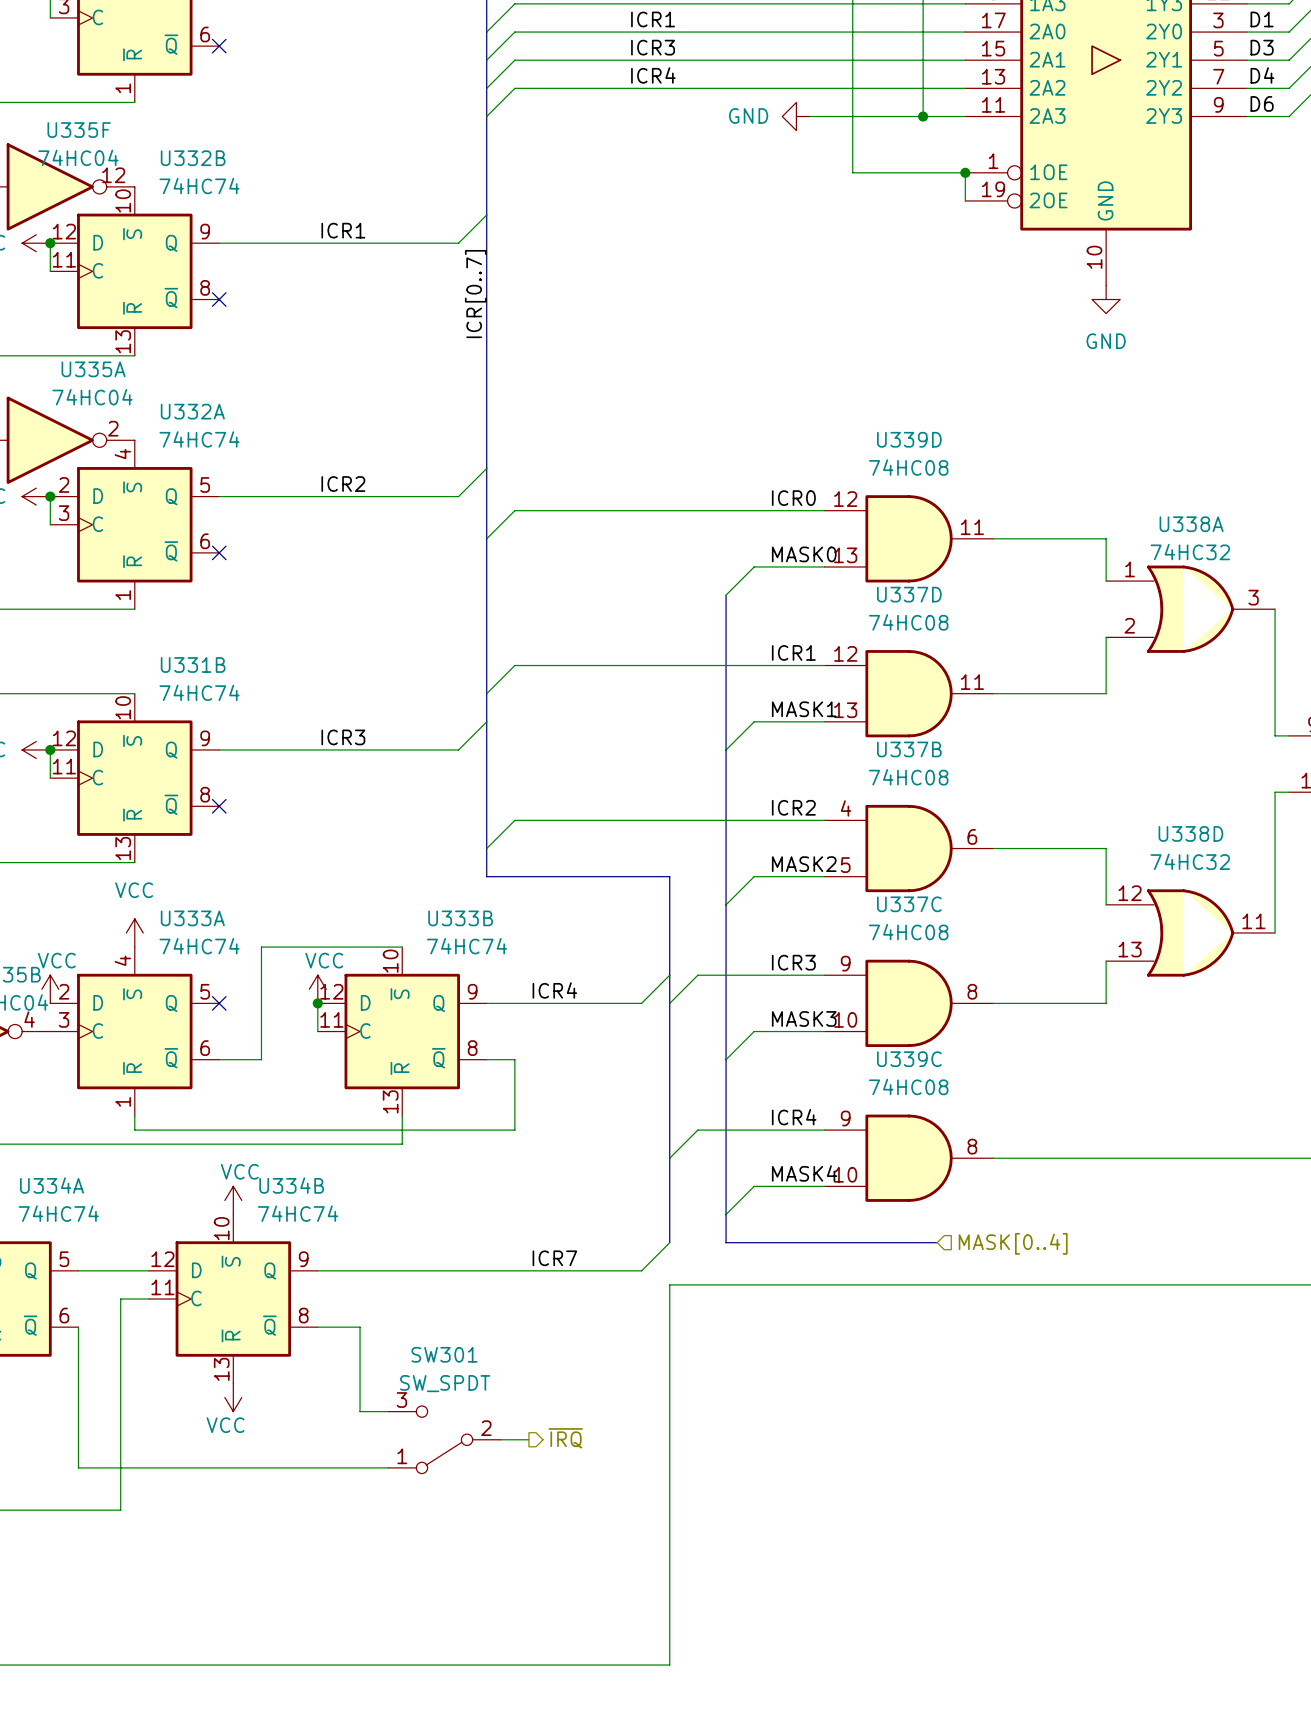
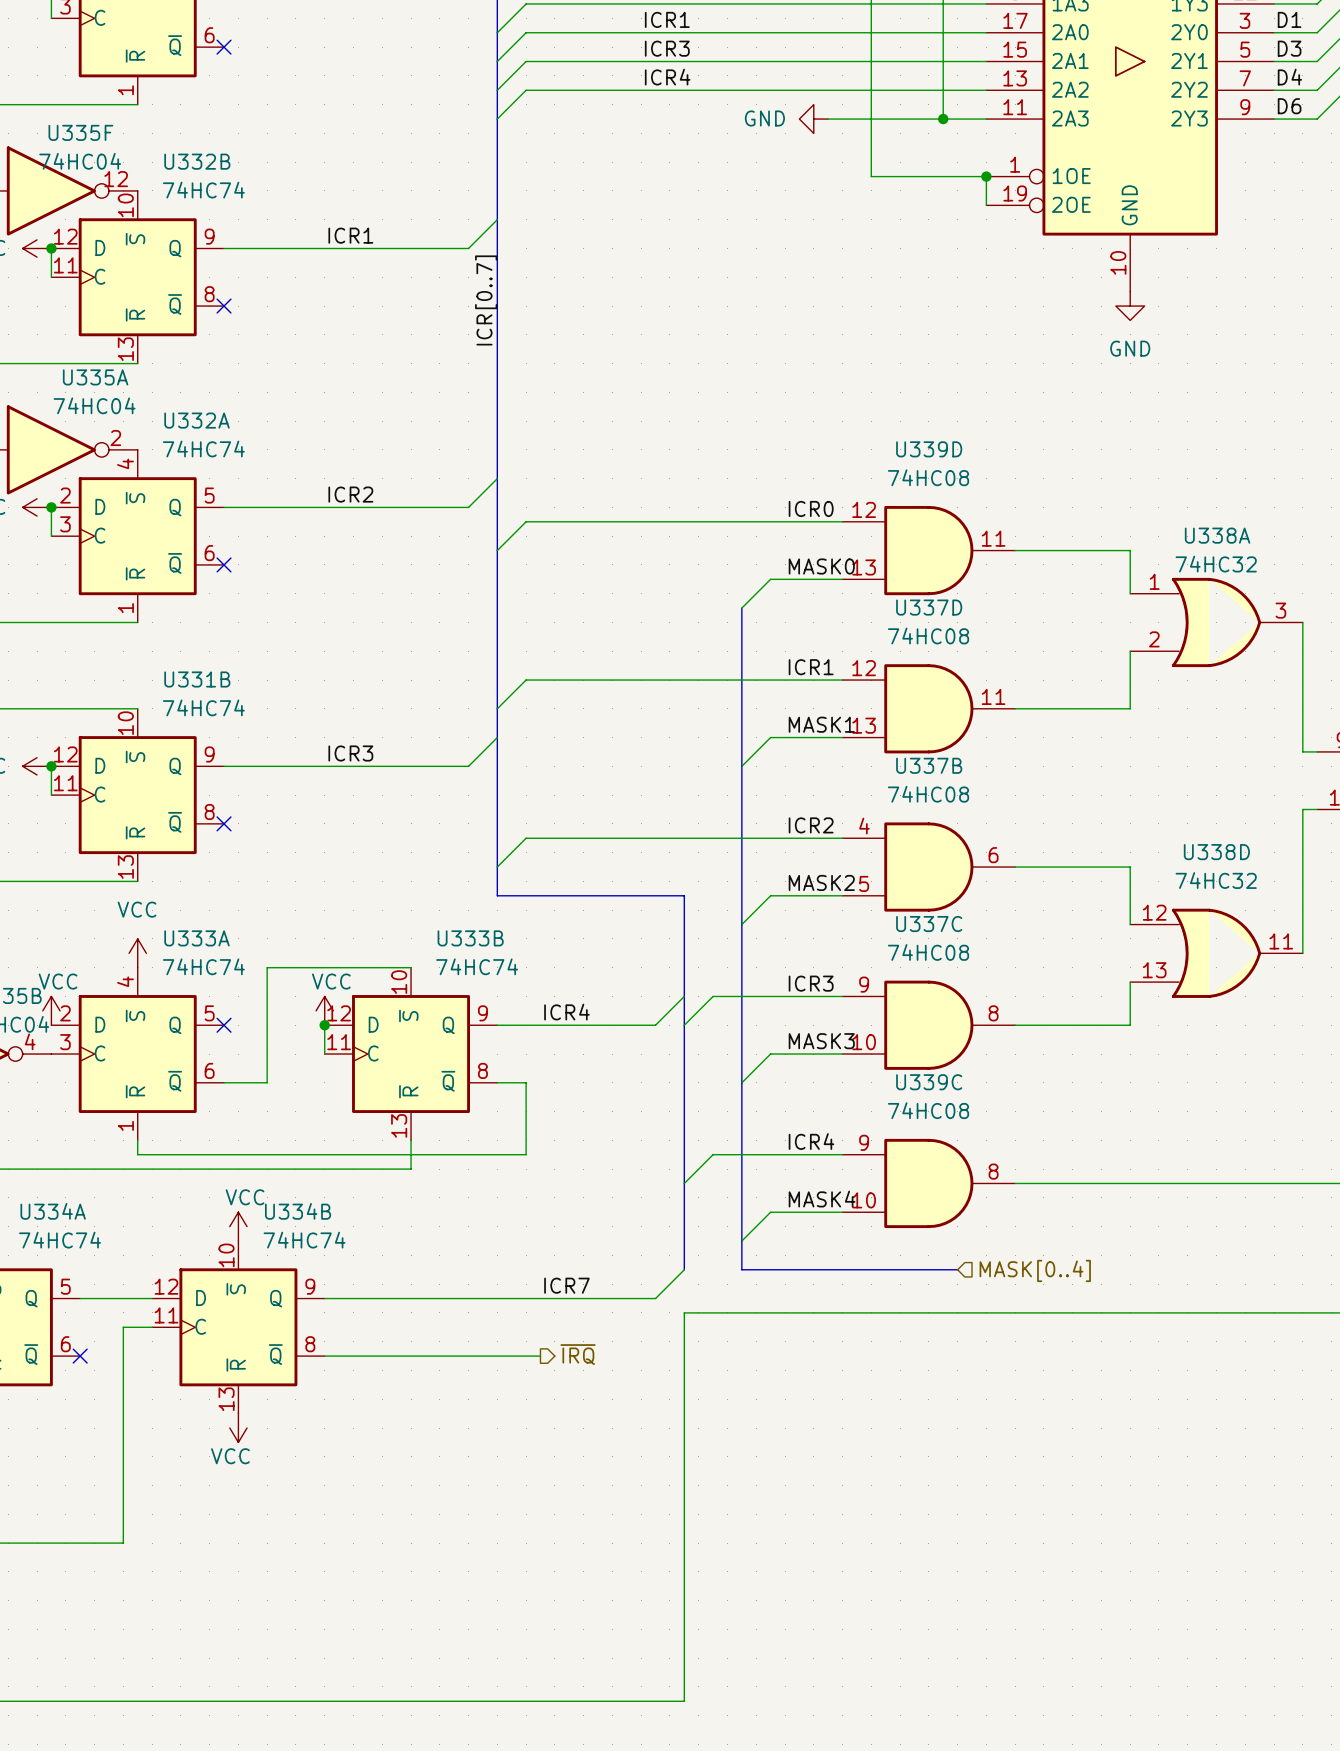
wire: (78, 1327) (78, 1467) (388, 1467) -> none
no-connect mark: none -> (80, 1356)
wire: (360, 1327) (360, 1411) (388, 1411) -> (367, 1356) (540, 1356)
hierarchical label position: ~{IRQ} (565, 1438) -> ~{IRQ} (578, 1354)
SW301: SW_SPDT (444, 1439) -> none
wire: (500, 1439) (528, 1439) -> none

